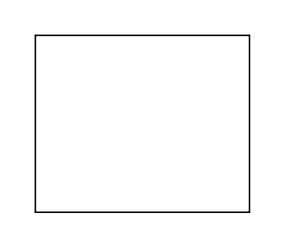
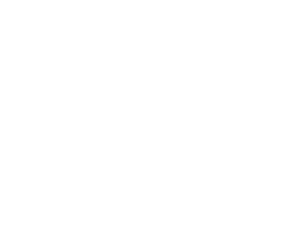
board edge: (35, 35) (249, 35) (249, 212) (35, 212) (35, 35) -> none

